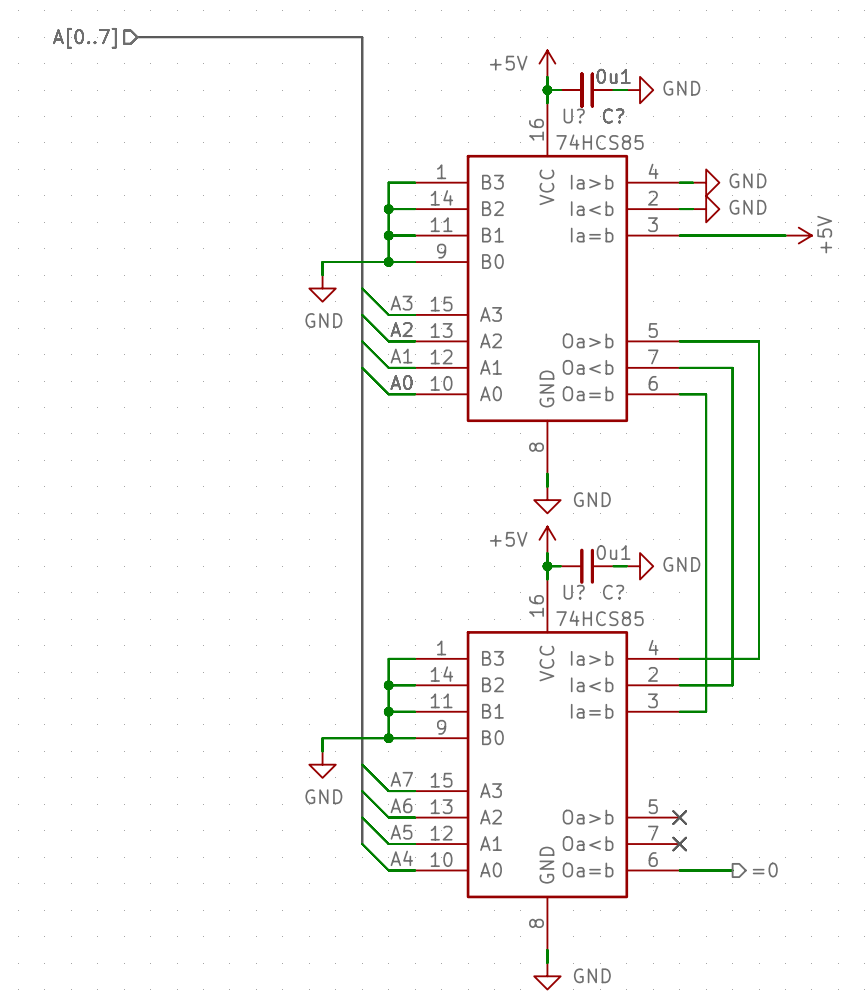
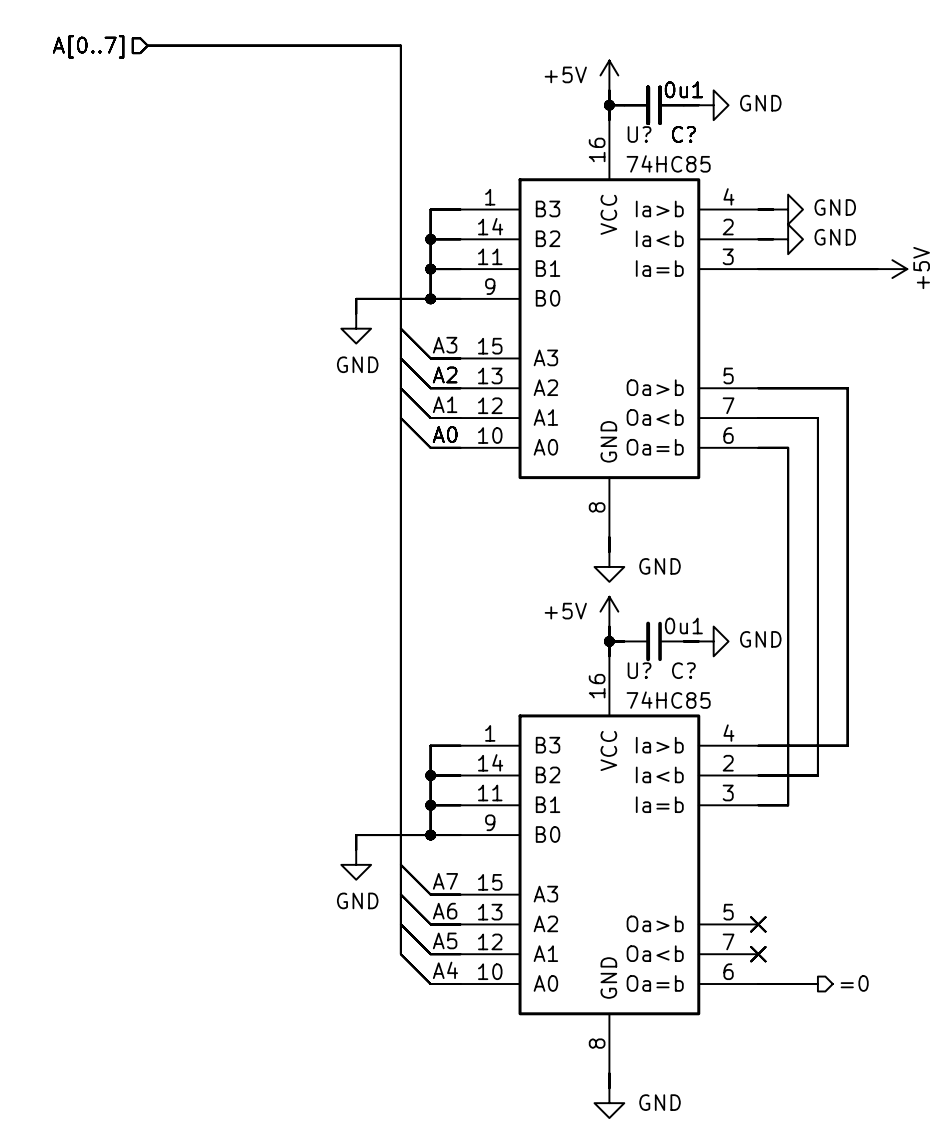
U? value: 74HCS85 (600, 142) -> 74HC85 (668, 163)
U? value: 74HCS85 (600, 618) -> 74HC85 (668, 700)

